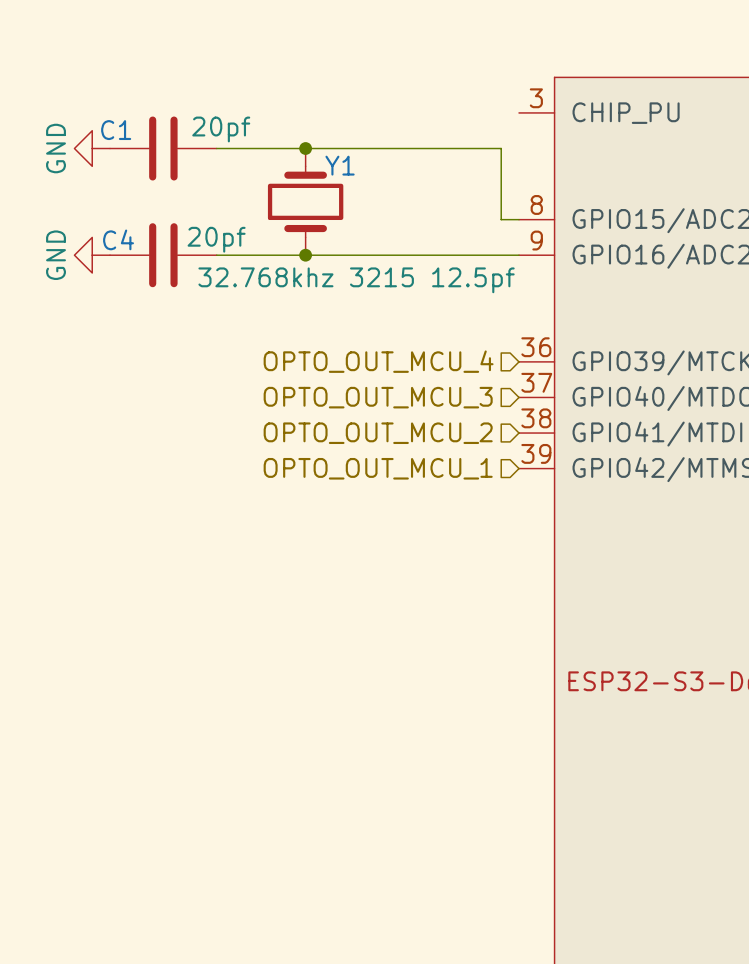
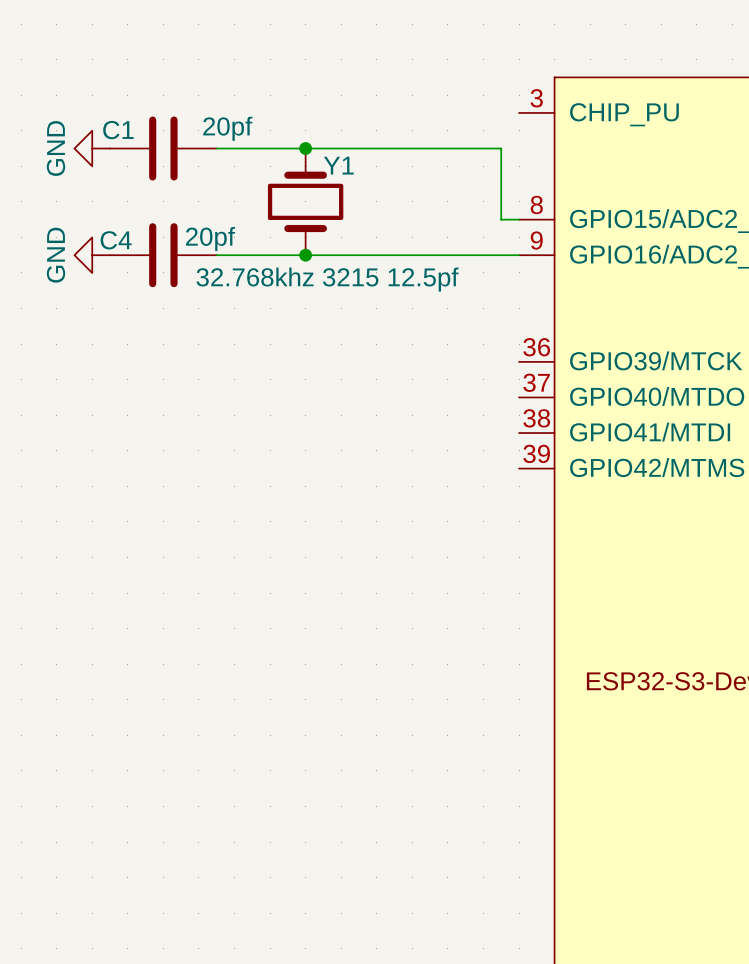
hierarchical label: OPTO_OUT_MCU_4 (378, 361) -> none
hierarchical label: OPTO_OUT_MCU_3 (378, 397) -> none
hierarchical label: OPTO_OUT_MCU_2 (378, 433) -> none
hierarchical label: OPTO_OUT_MCU_1 (378, 468) -> none

